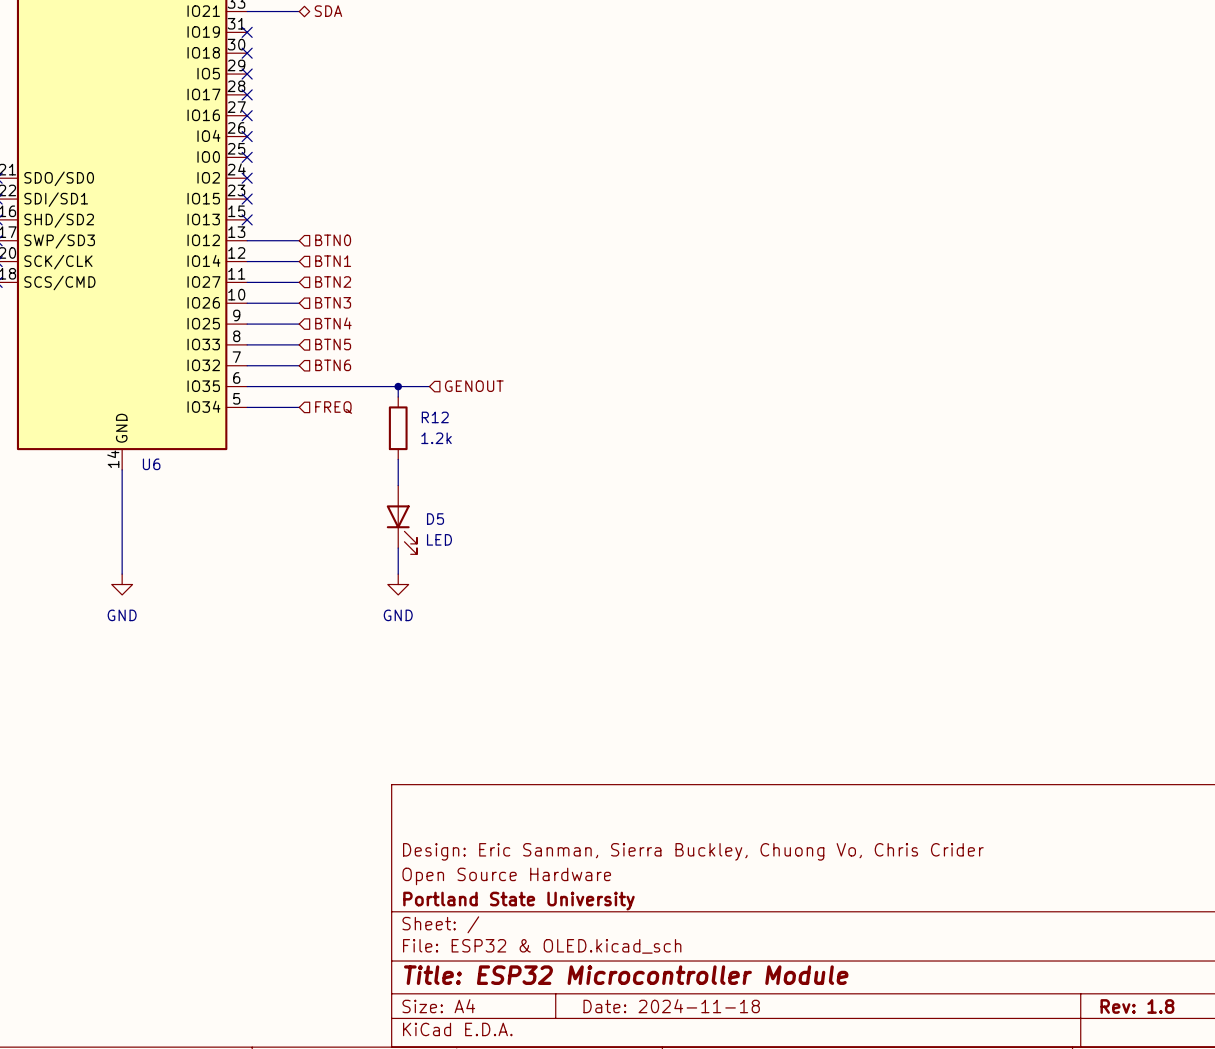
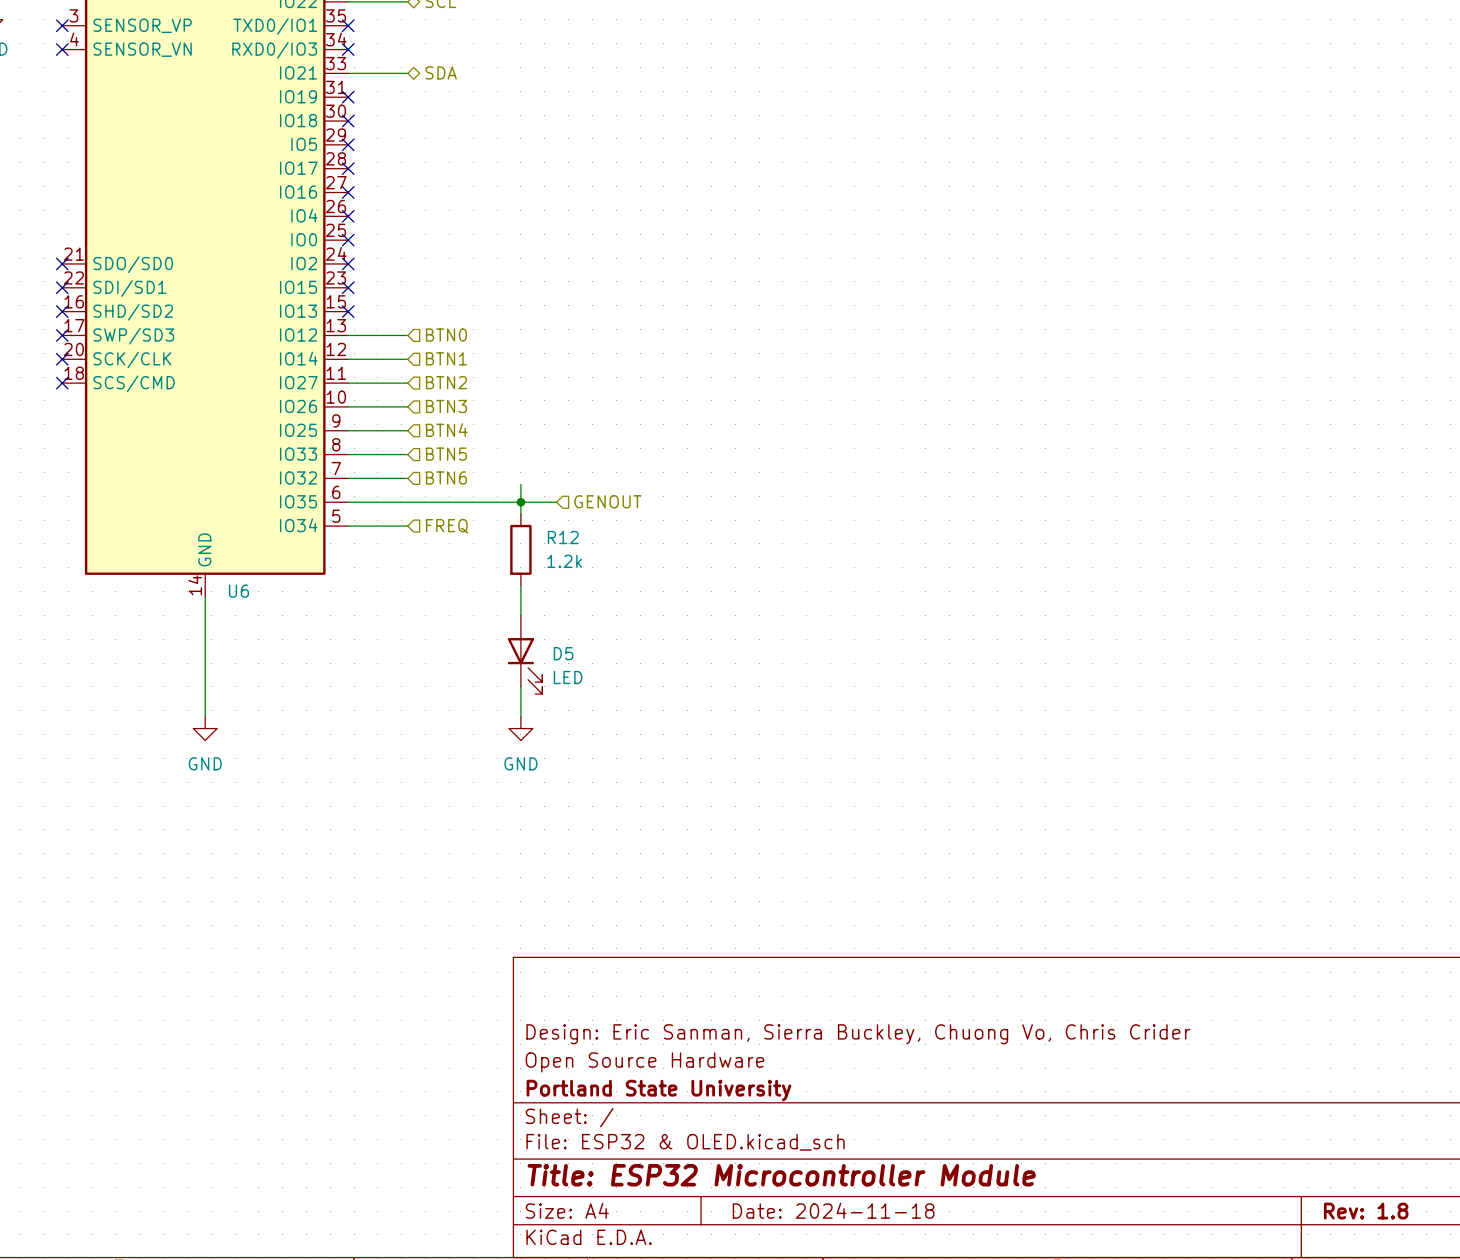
wire: none -> (520, 484) (520, 502)

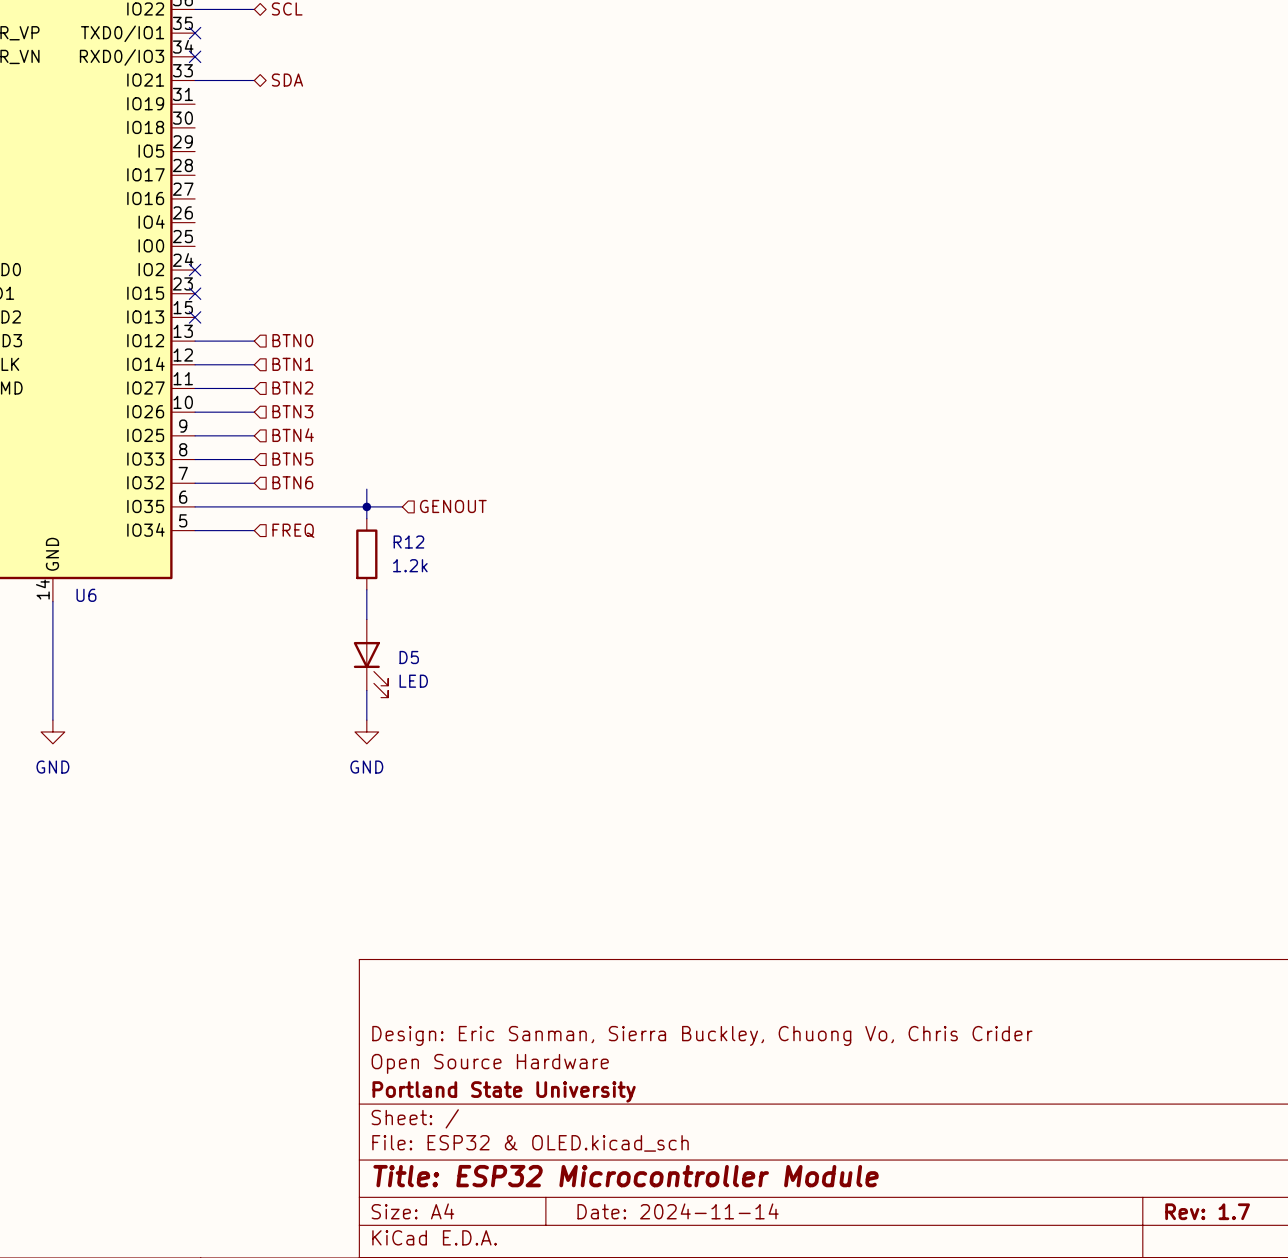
no-connect mark: (348, 97) -> none
no-connect mark: (348, 121) -> none
no-connect mark: (348, 144) -> none
no-connect mark: (348, 168) -> none
no-connect mark: (348, 192) -> none
no-connect mark: (348, 216) -> none
no-connect mark: (348, 240) -> none
title block: Date: 2024-11-18 (833, 1210) -> Date: 2024-11-14 (678, 1211)
title block: Rev: 1.8 (1366, 1211) -> Rev: 1.7 (1207, 1211)

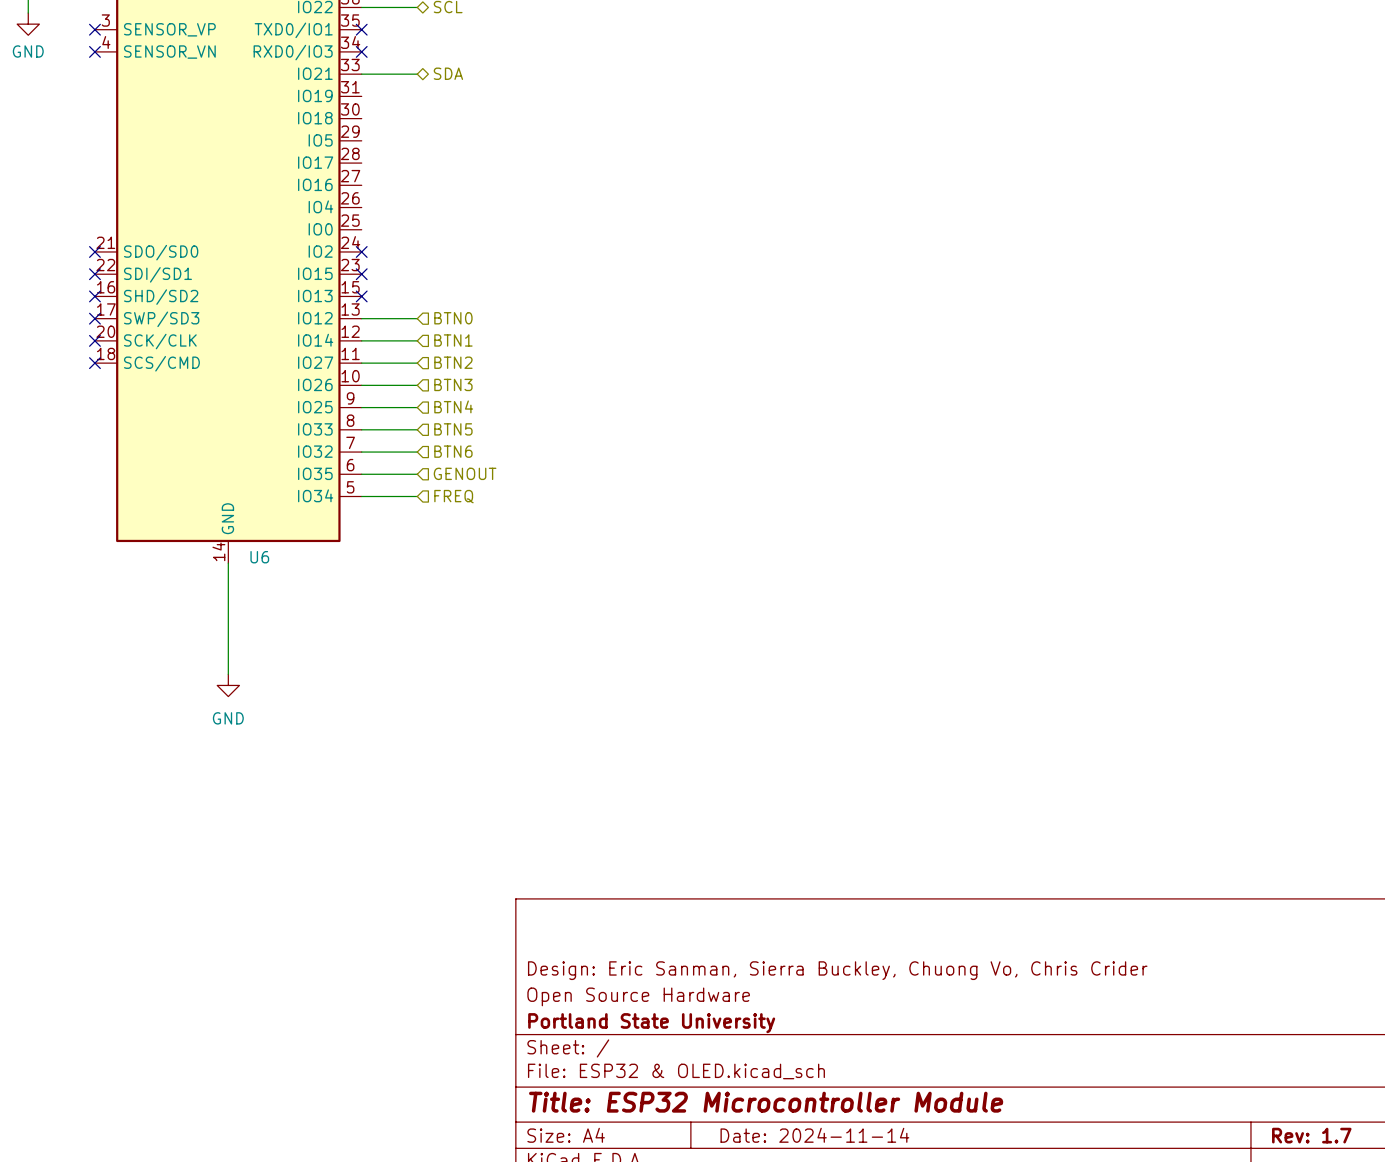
wire: (366, 489) (366, 518) -> none
wire: (254, 506) (402, 506) -> none
junction: (366, 506) -> none
hierarchical label position: GENOUT (453, 506) -> GENOUT (465, 473)
R12: 1.2k (366, 554) -> none
wire: (366, 589) (366, 619) -> none
D5: LED (370, 658) -> none
wire: (366, 690) (366, 720) -> none
power symbol: GND (366, 731) -> none

